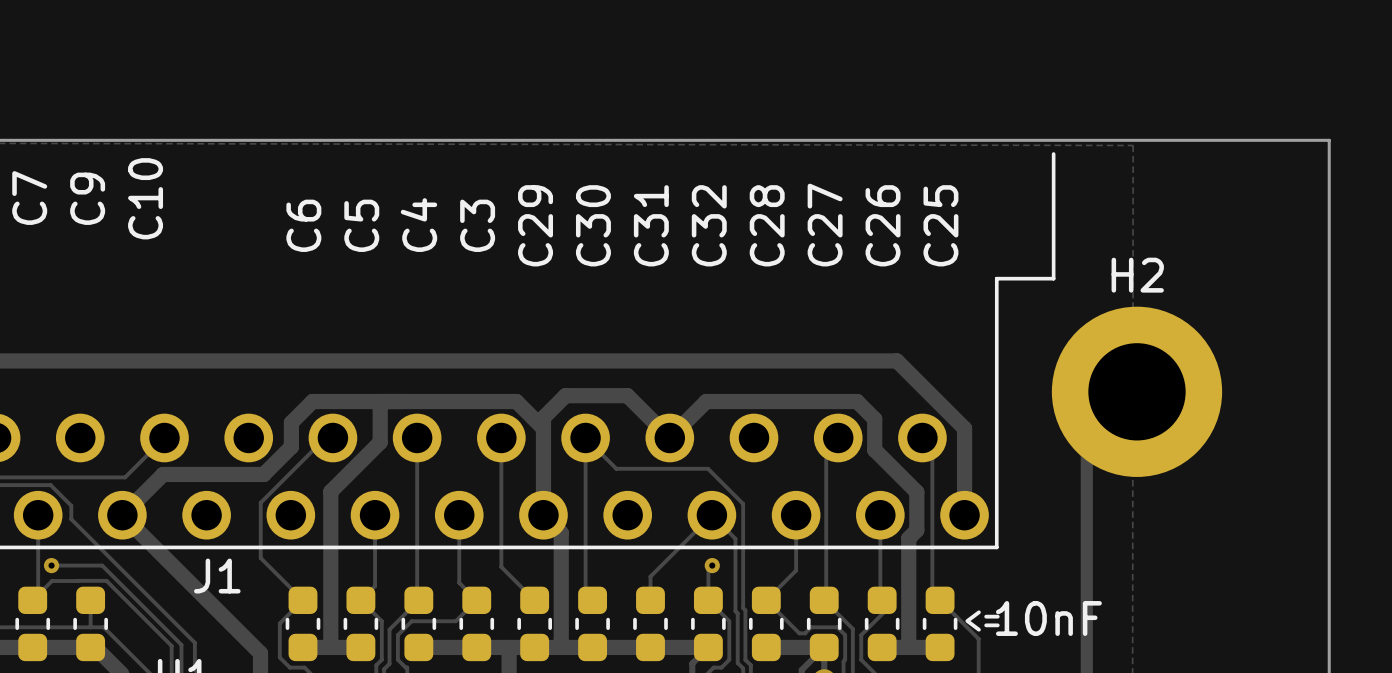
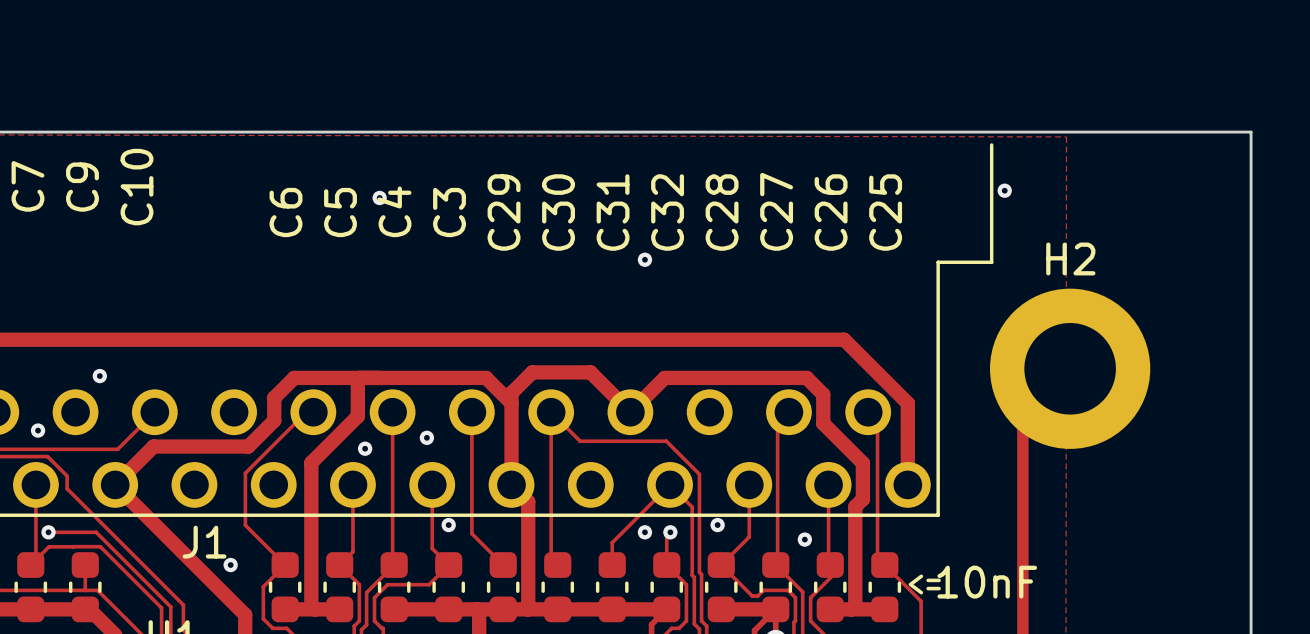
via: none -> (1004, 190)
via: none -> (379, 197)
via: none -> (644, 259)
via: none -> (99, 376)
via: none -> (38, 430)
via: none -> (426, 437)
via: none -> (365, 448)
via: none -> (448, 525)
via: none -> (717, 525)
via: none -> (644, 532)
via: none -> (804, 539)
via: none -> (230, 565)

